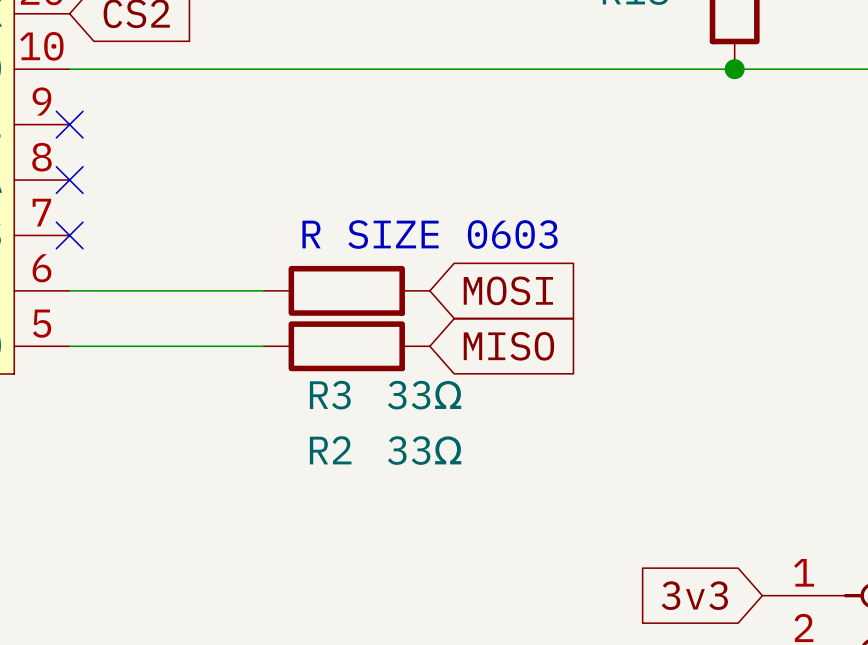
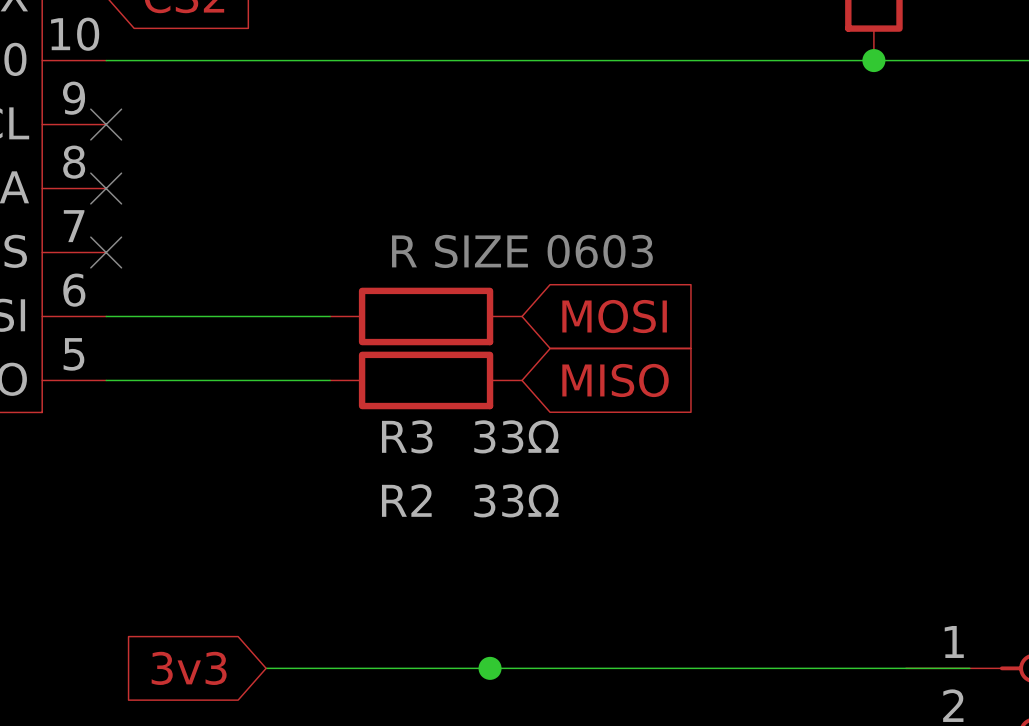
global label: none -> 3v3 (189, 668)
wire: none -> (266, 668) (969, 668)
junction: none -> (490, 668)
global label: 3v3 (694, 595) -> none

